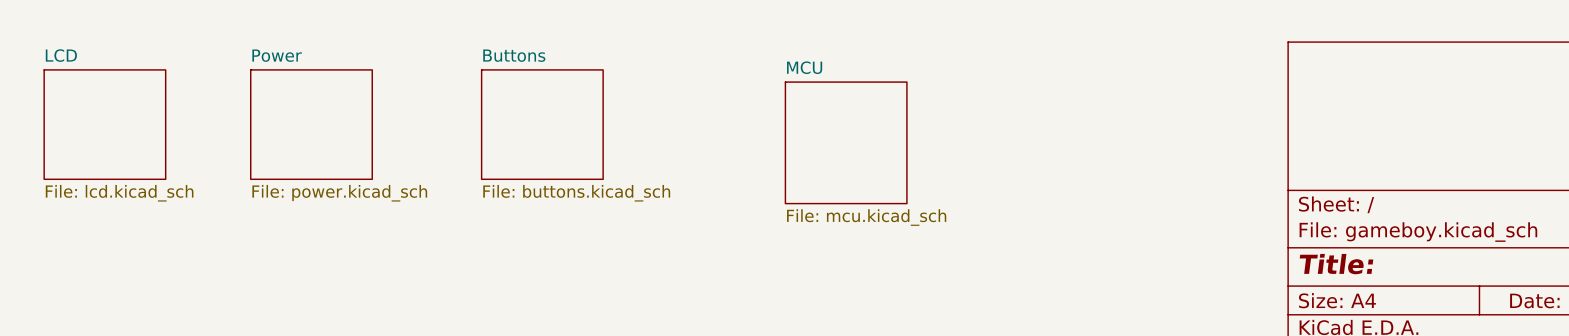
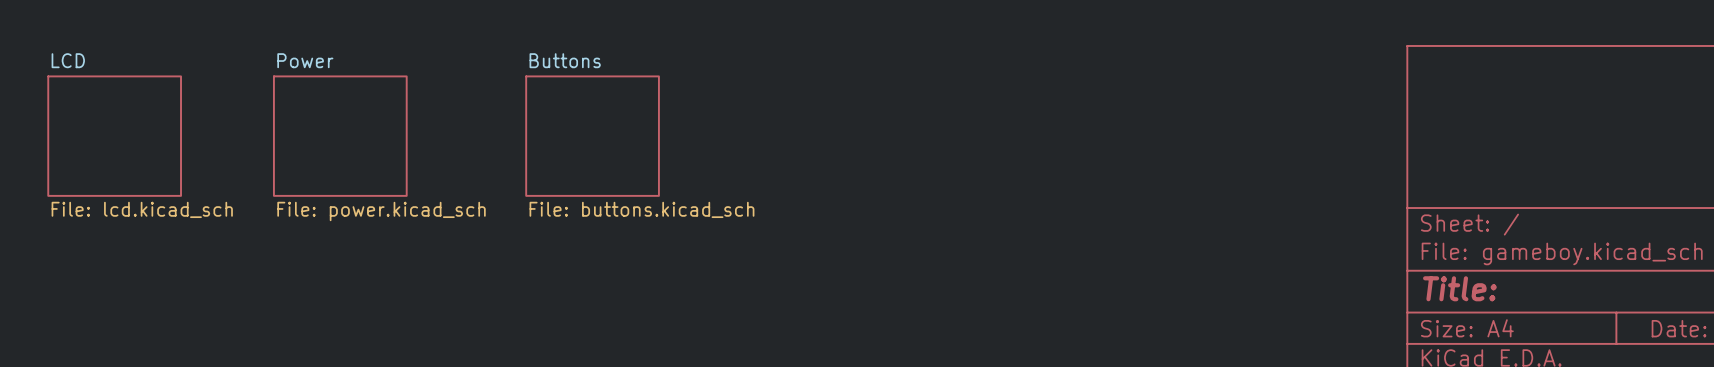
sheet MCU: File: mcu.kicad_sch (846, 142) -> none

